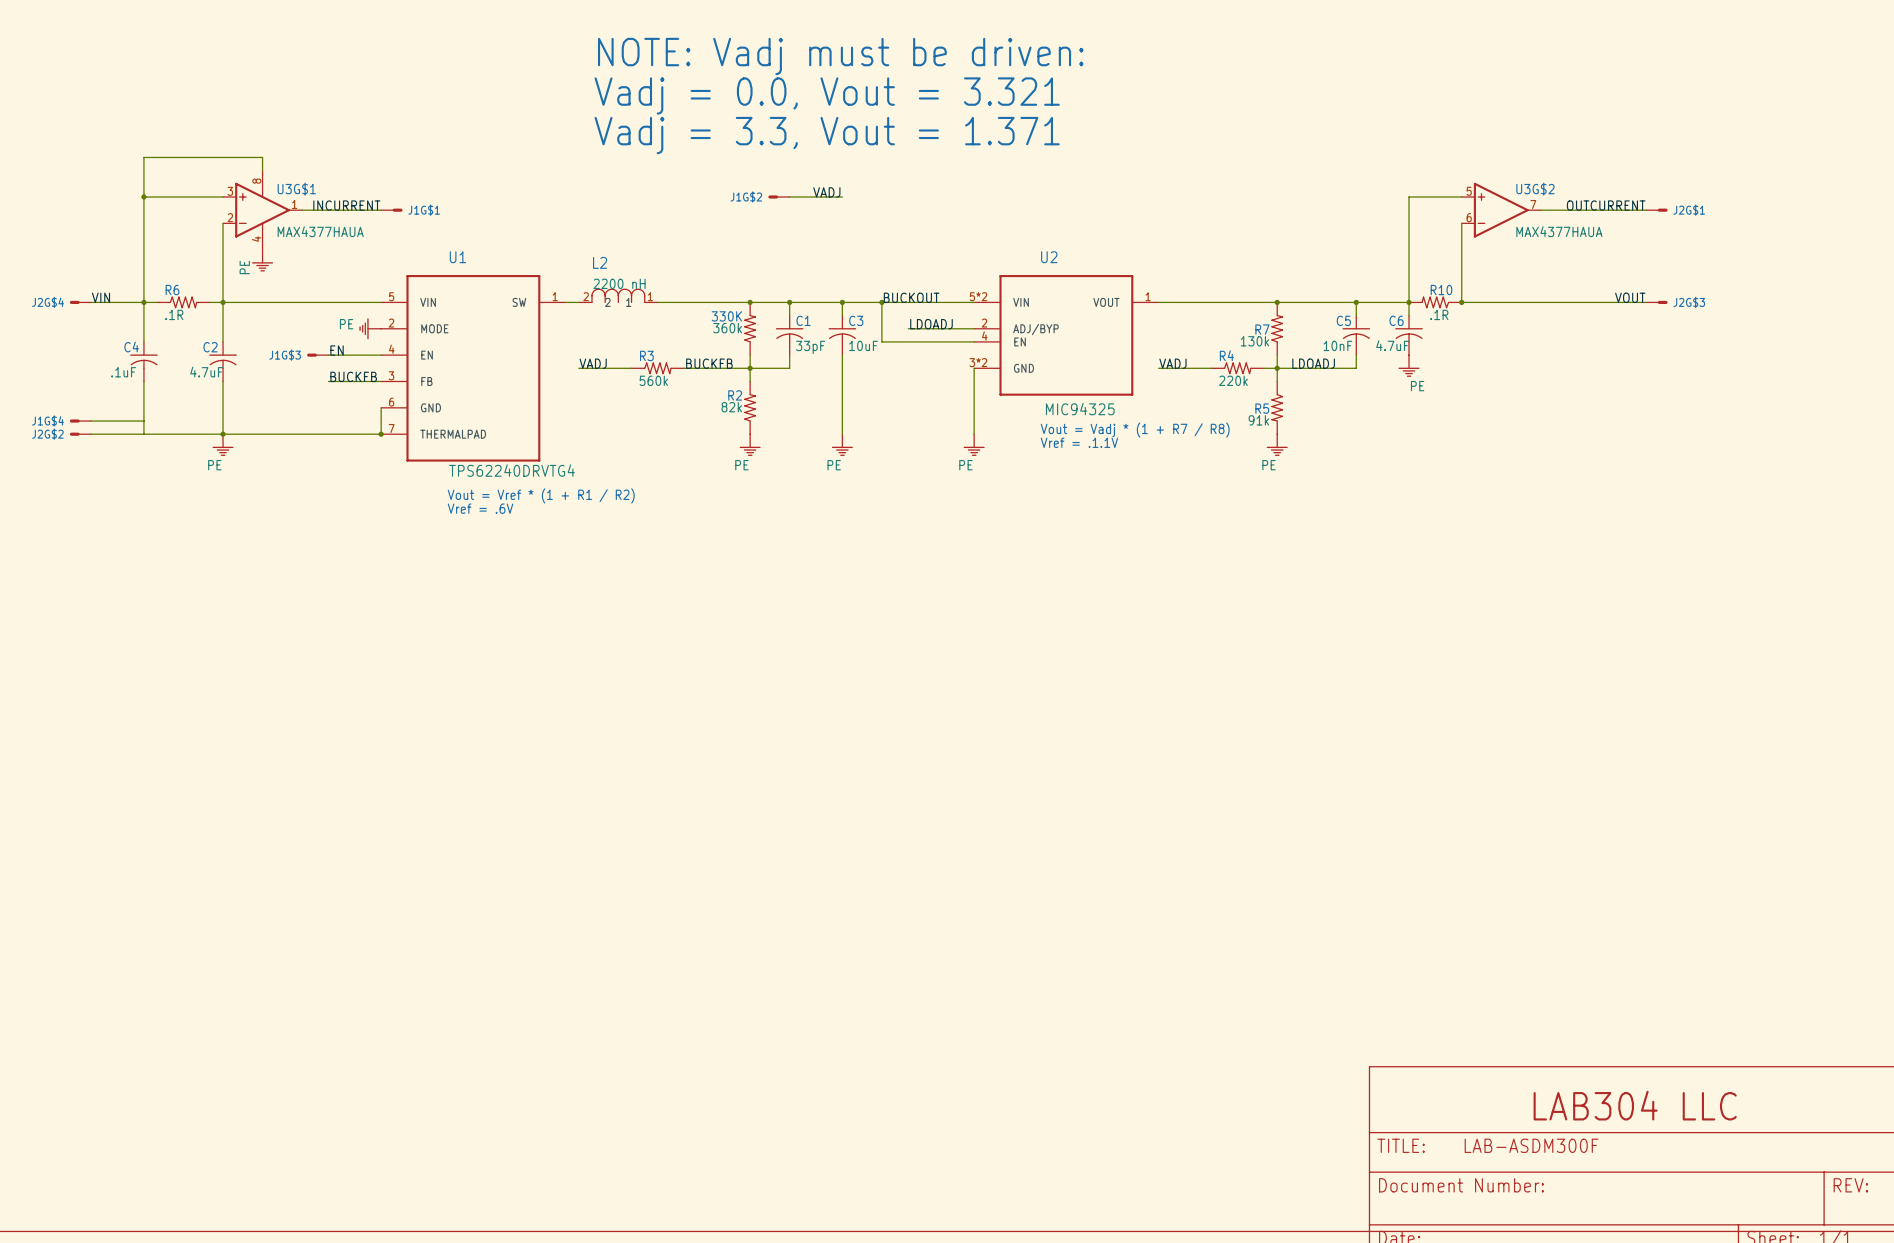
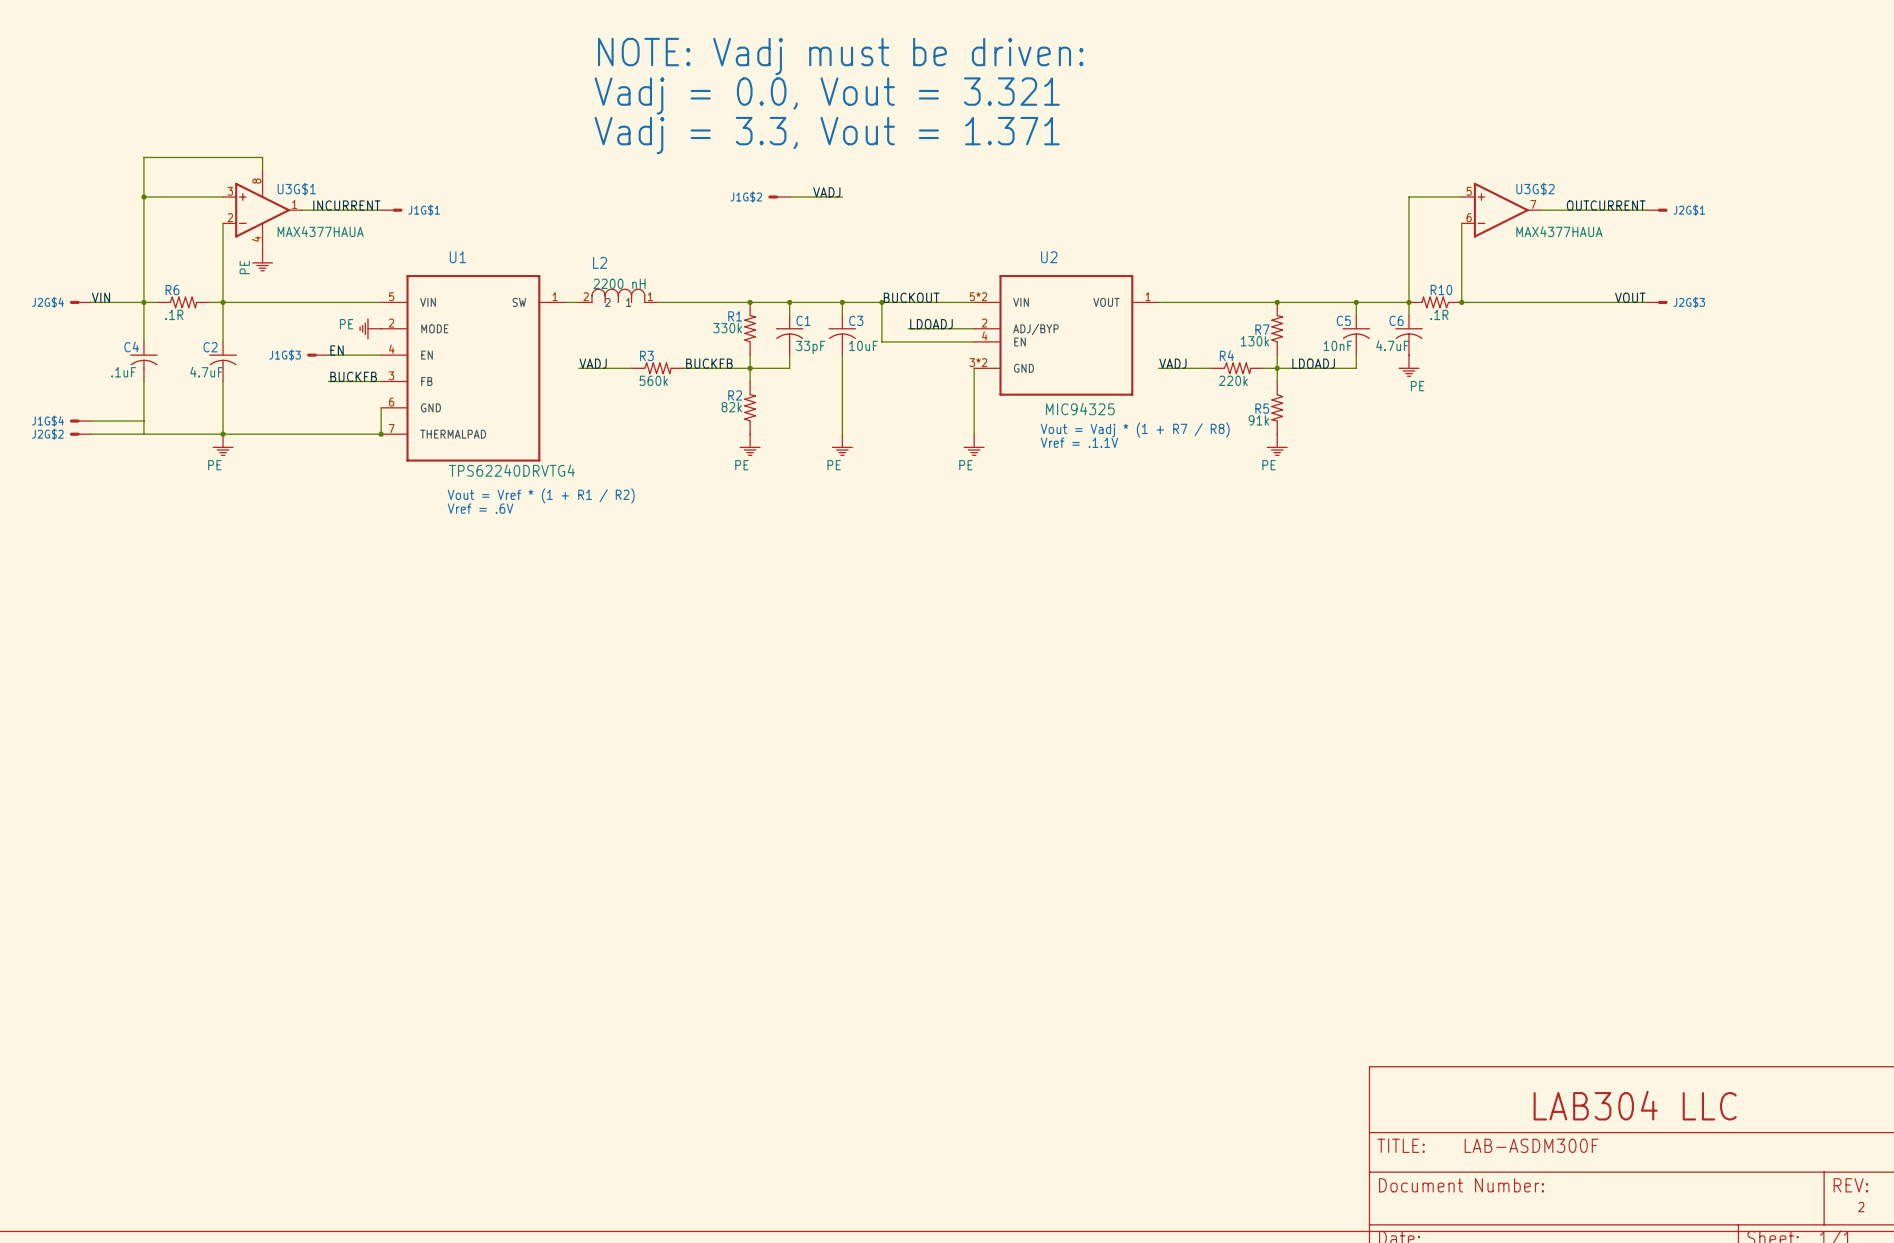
330K name: 330K (726, 316) -> R1 (735, 316)
330K value: 360k (727, 328) -> 330k (727, 328)
text: none -> 2 (1861, 1207)

